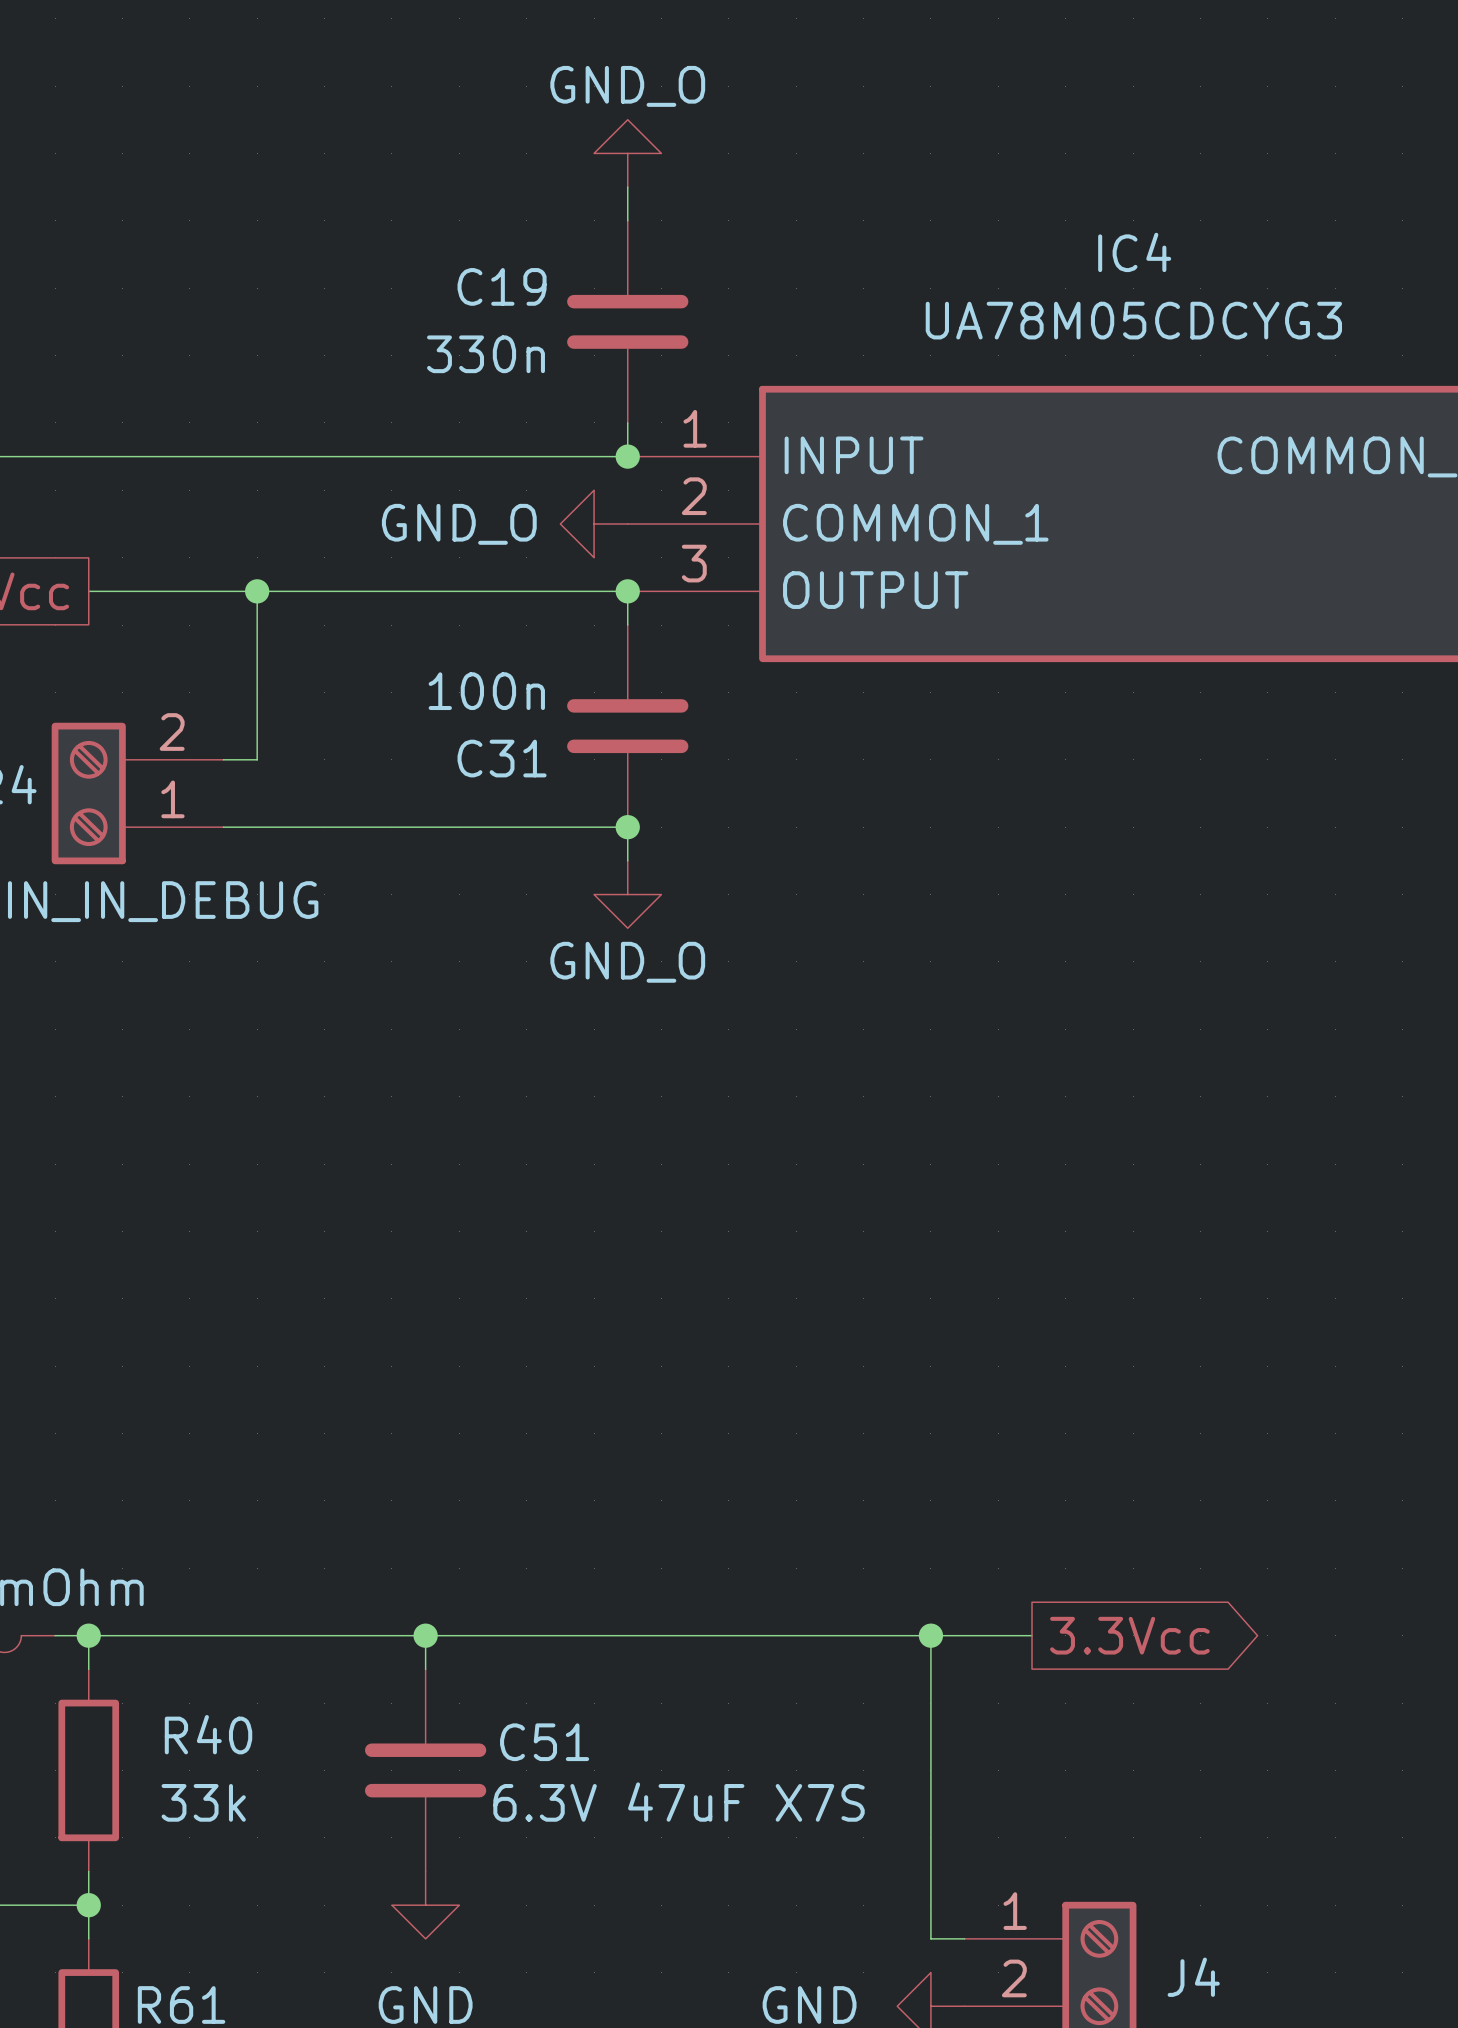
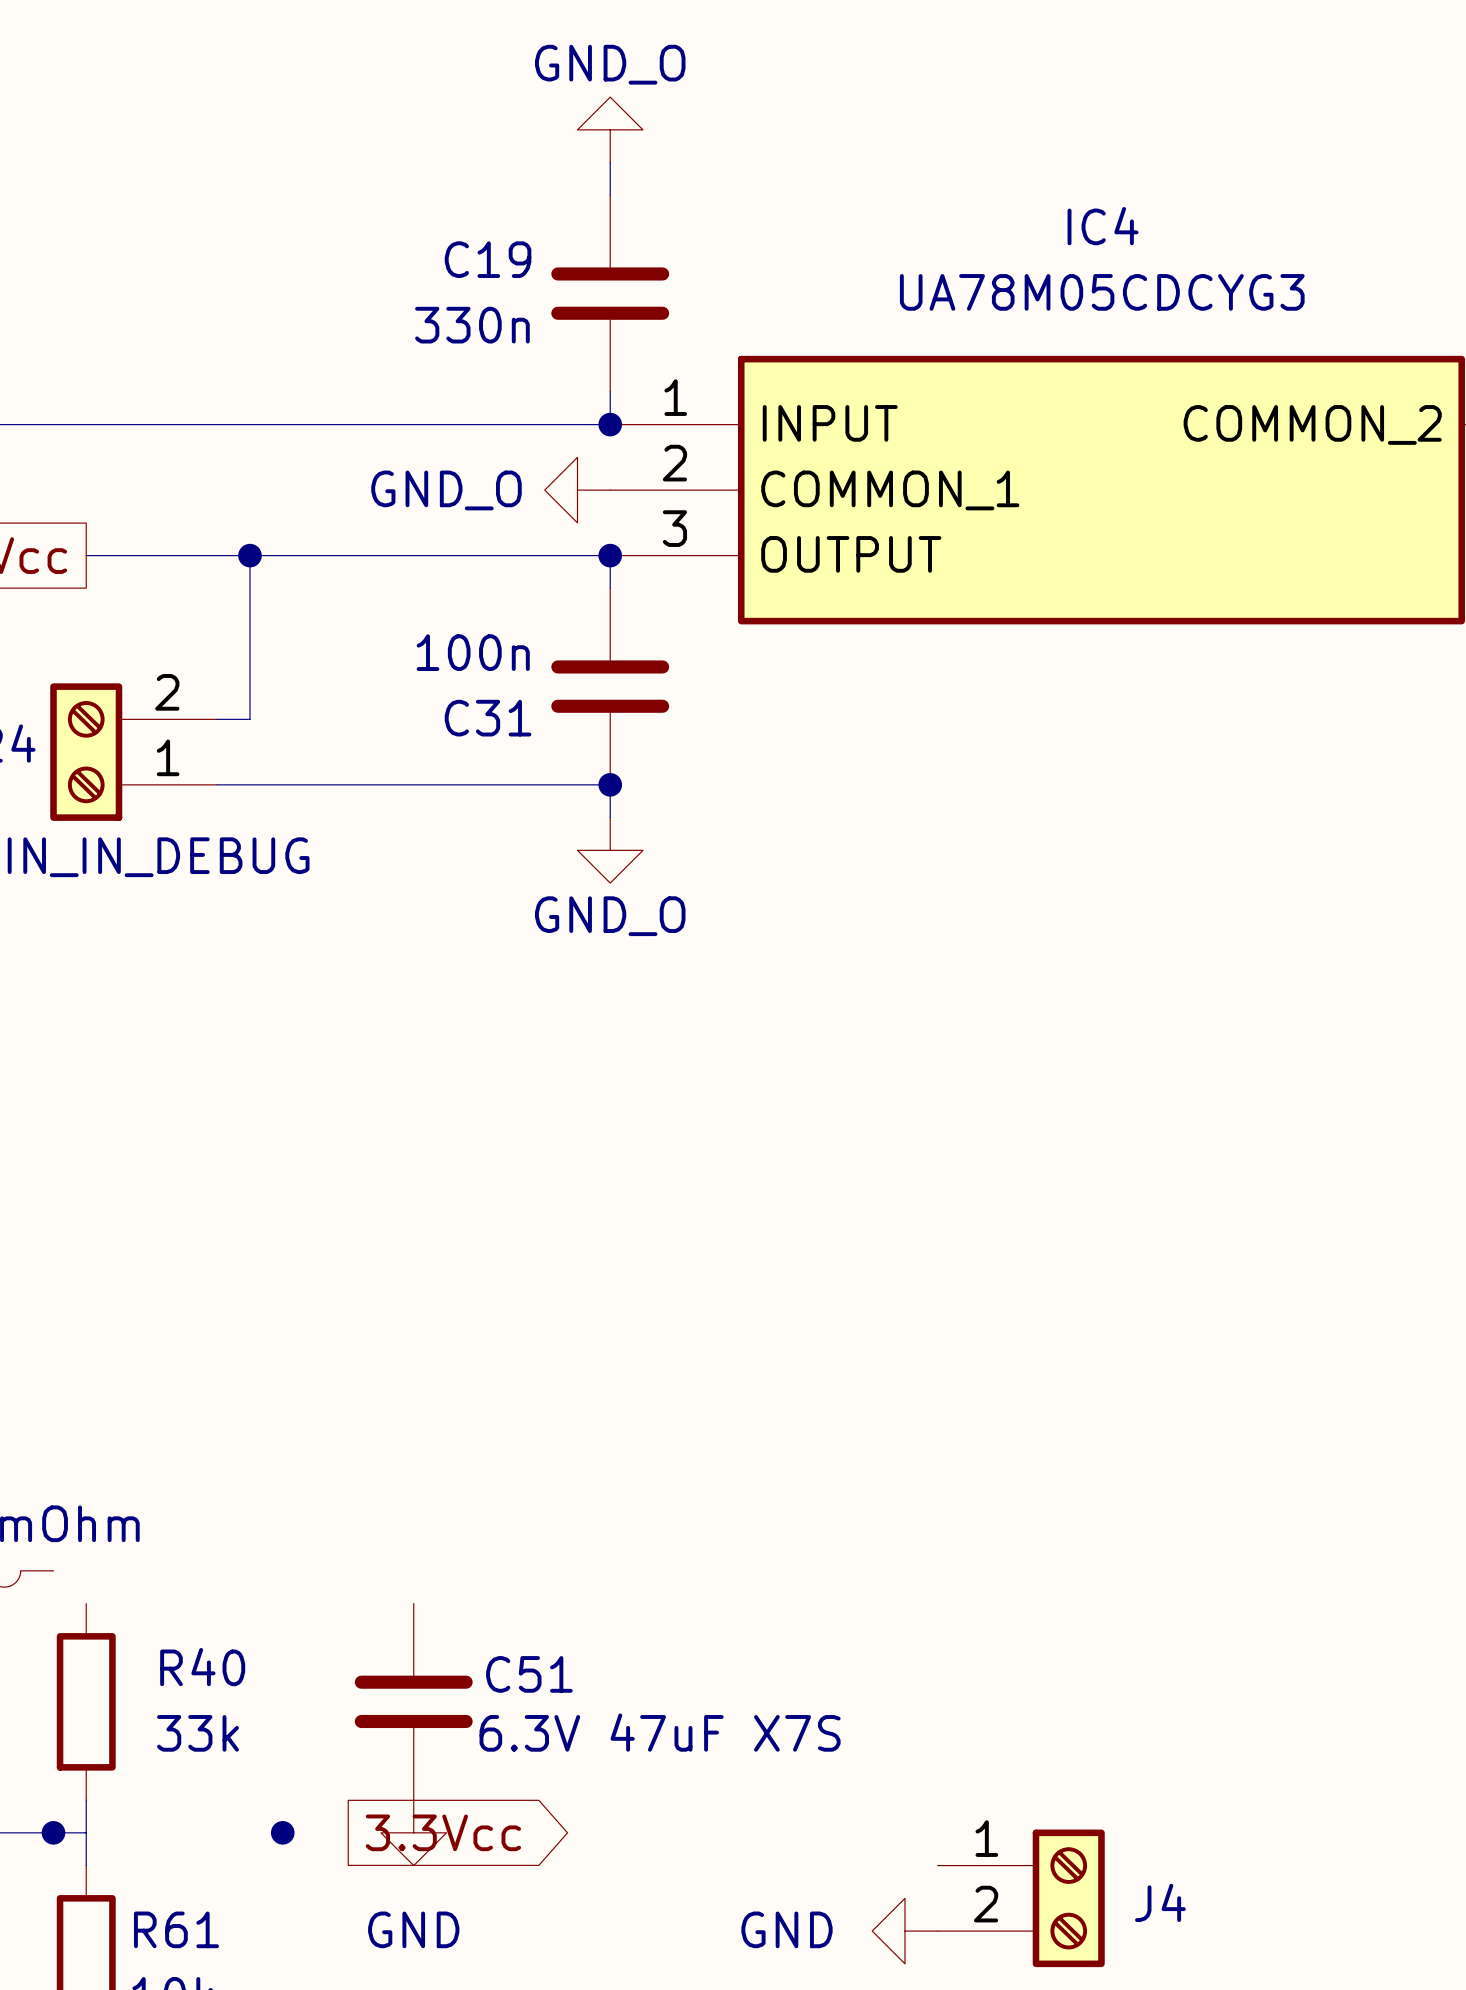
wire: (55, 1635) (1032, 1635) -> none
wire: (88, 1635) (88, 1669) -> none
junction: (88, 1635) -> none
wire: (425, 1635) (425, 1669) -> none
junction: (425, 1635) -> none
wire: (930, 1635) (930, 1938) (964, 1938) -> none
junction: (930, 1635) -> none
global label: 3.3Vcc (1129, 1635) -> none
junction position: (88, 1905) -> (53, 1832)
junction: none -> (282, 1832)
global label: none -> 3.3Vcc (443, 1832)

